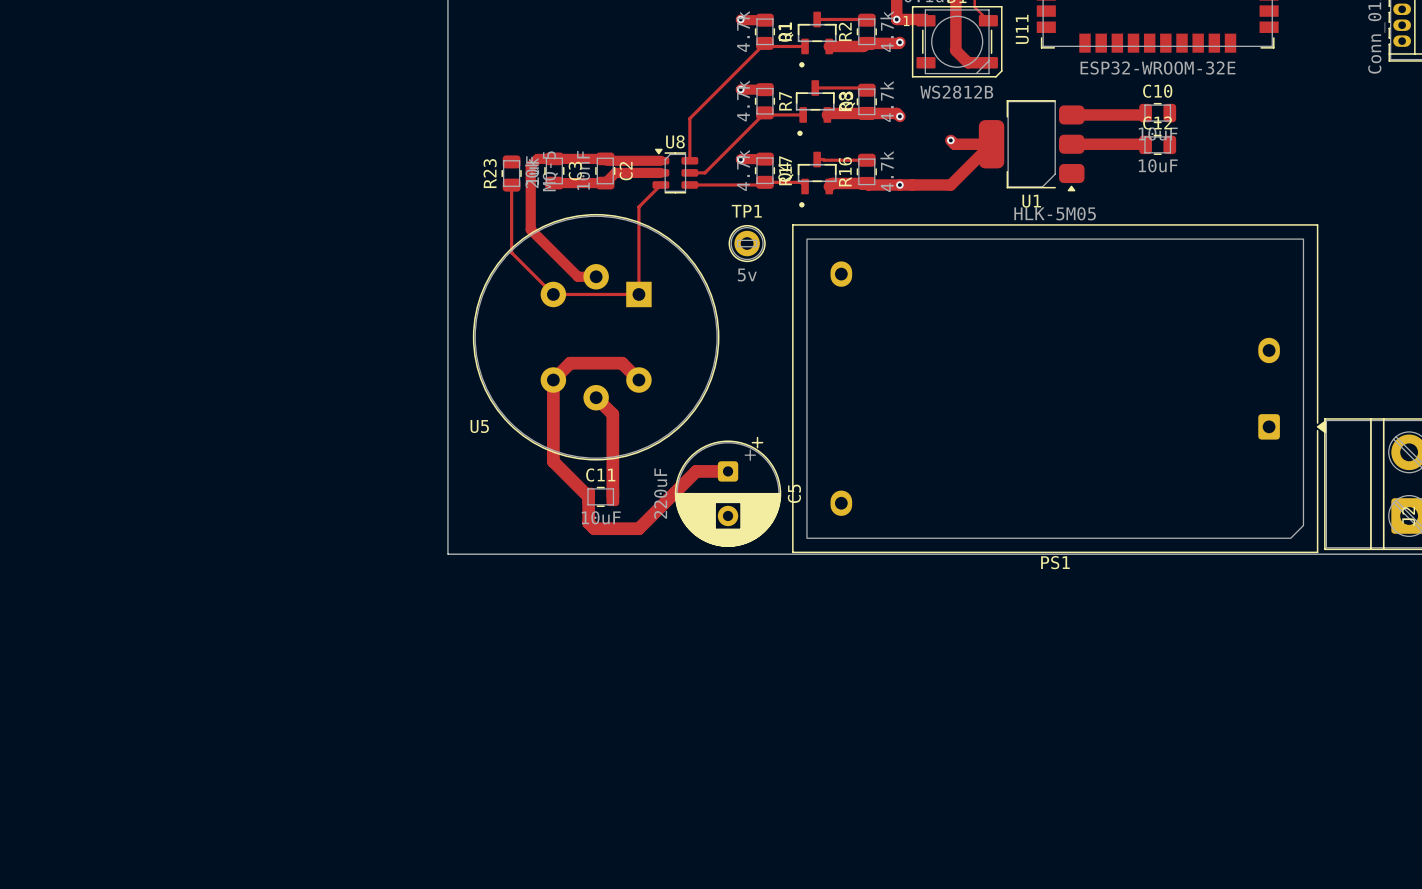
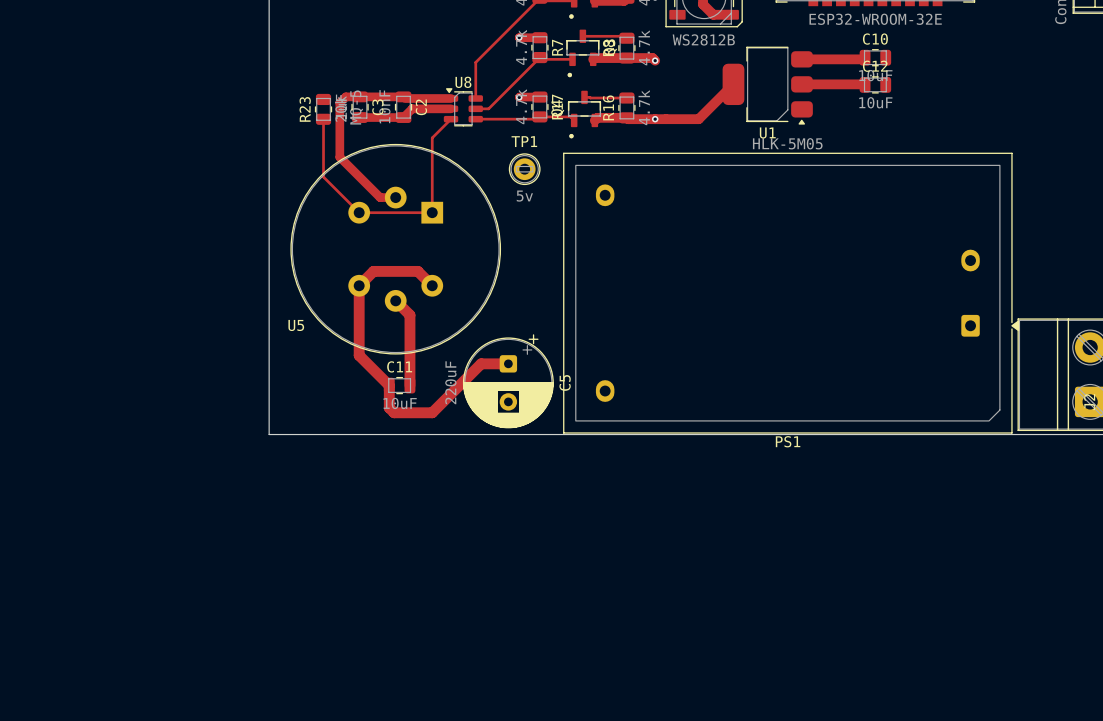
track: (950, 140) (954, 144) (991, 144) -> none
via: (950, 140) -> none

